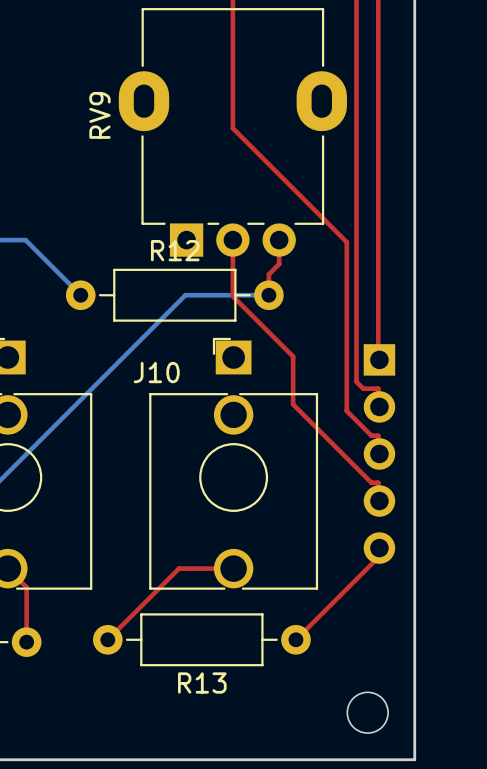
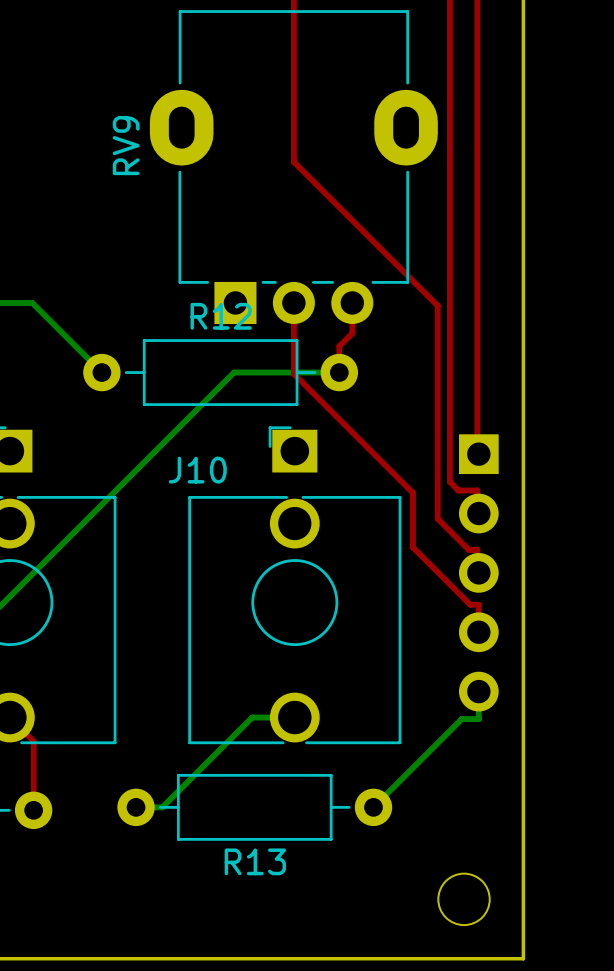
top track: (293, 356) (293, 404) (371, 482) (378, 482) (378, 504) -> (369, 449) (412, 493) (412, 547) (470, 604) (478, 604) (478, 632)
top track: (379, 548) (379, 556) (295, 639) -> none
bottom track: none -> (478, 691) (478, 719) (461, 719) (373, 807)
top track: (233, 568) (178, 568) (107, 639) -> none
bottom track: none -> (294, 717) (252, 717) (162, 807) (136, 807)

